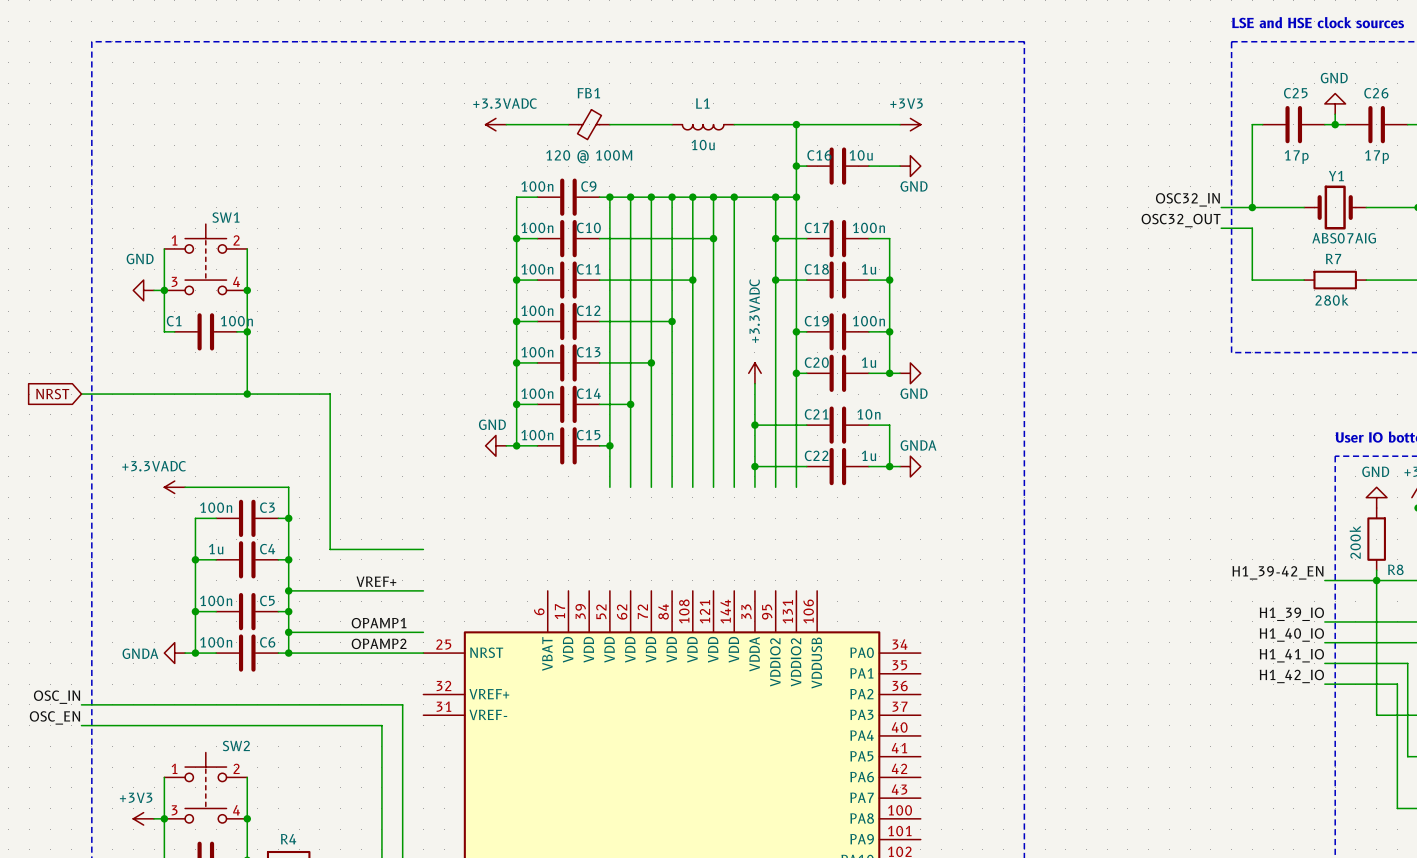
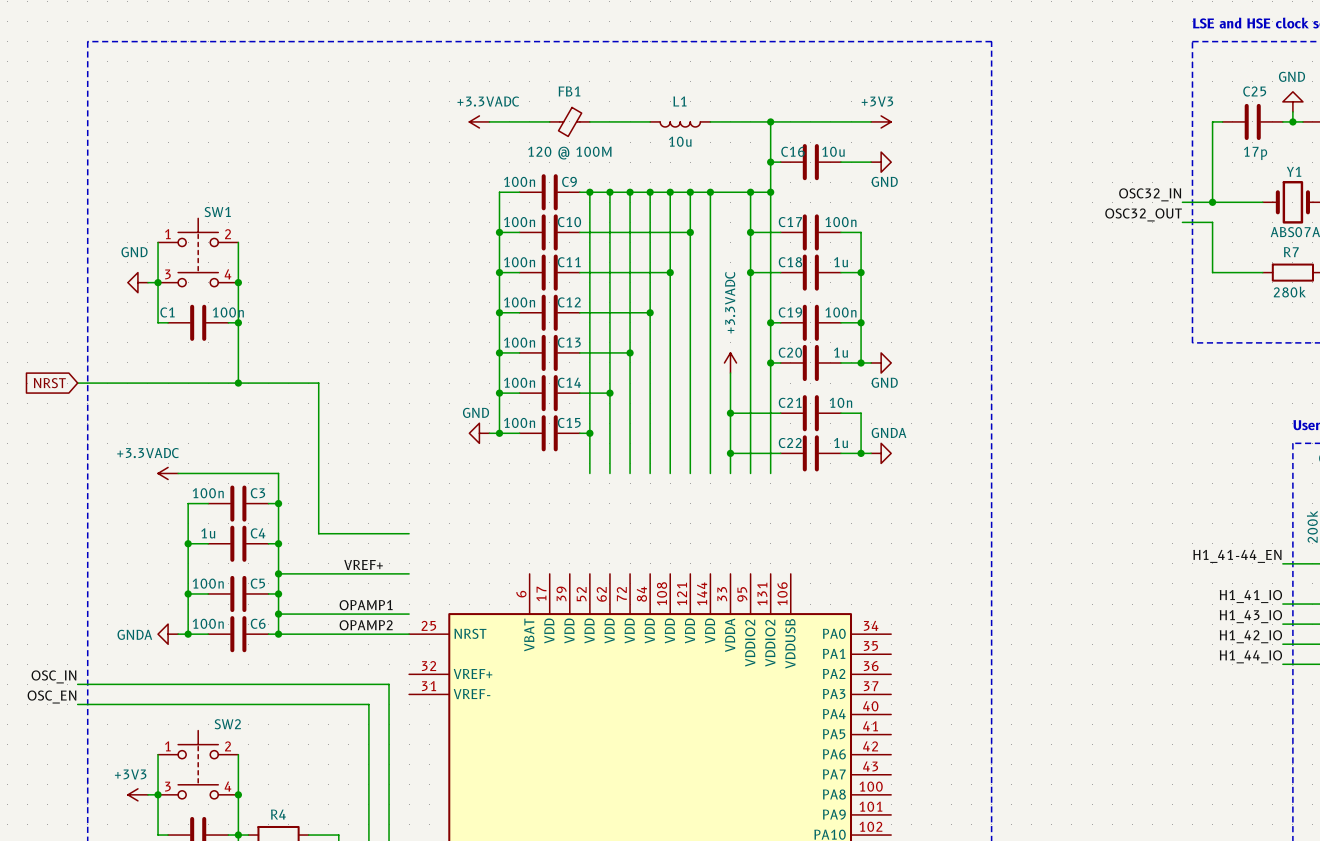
label: H1_39-42_EN (1277, 572) -> H1_41-44_EN (1237, 556)
label: H1_39_IO (1291, 614) -> H1_41_IO (1250, 596)
label: H1_40_IO (1291, 635) -> H1_43_IO (1250, 616)
label: H1_41_IO (1291, 655) -> H1_42_IO (1250, 636)
label: H1_42_IO (1291, 676) -> H1_44_IO (1250, 656)

